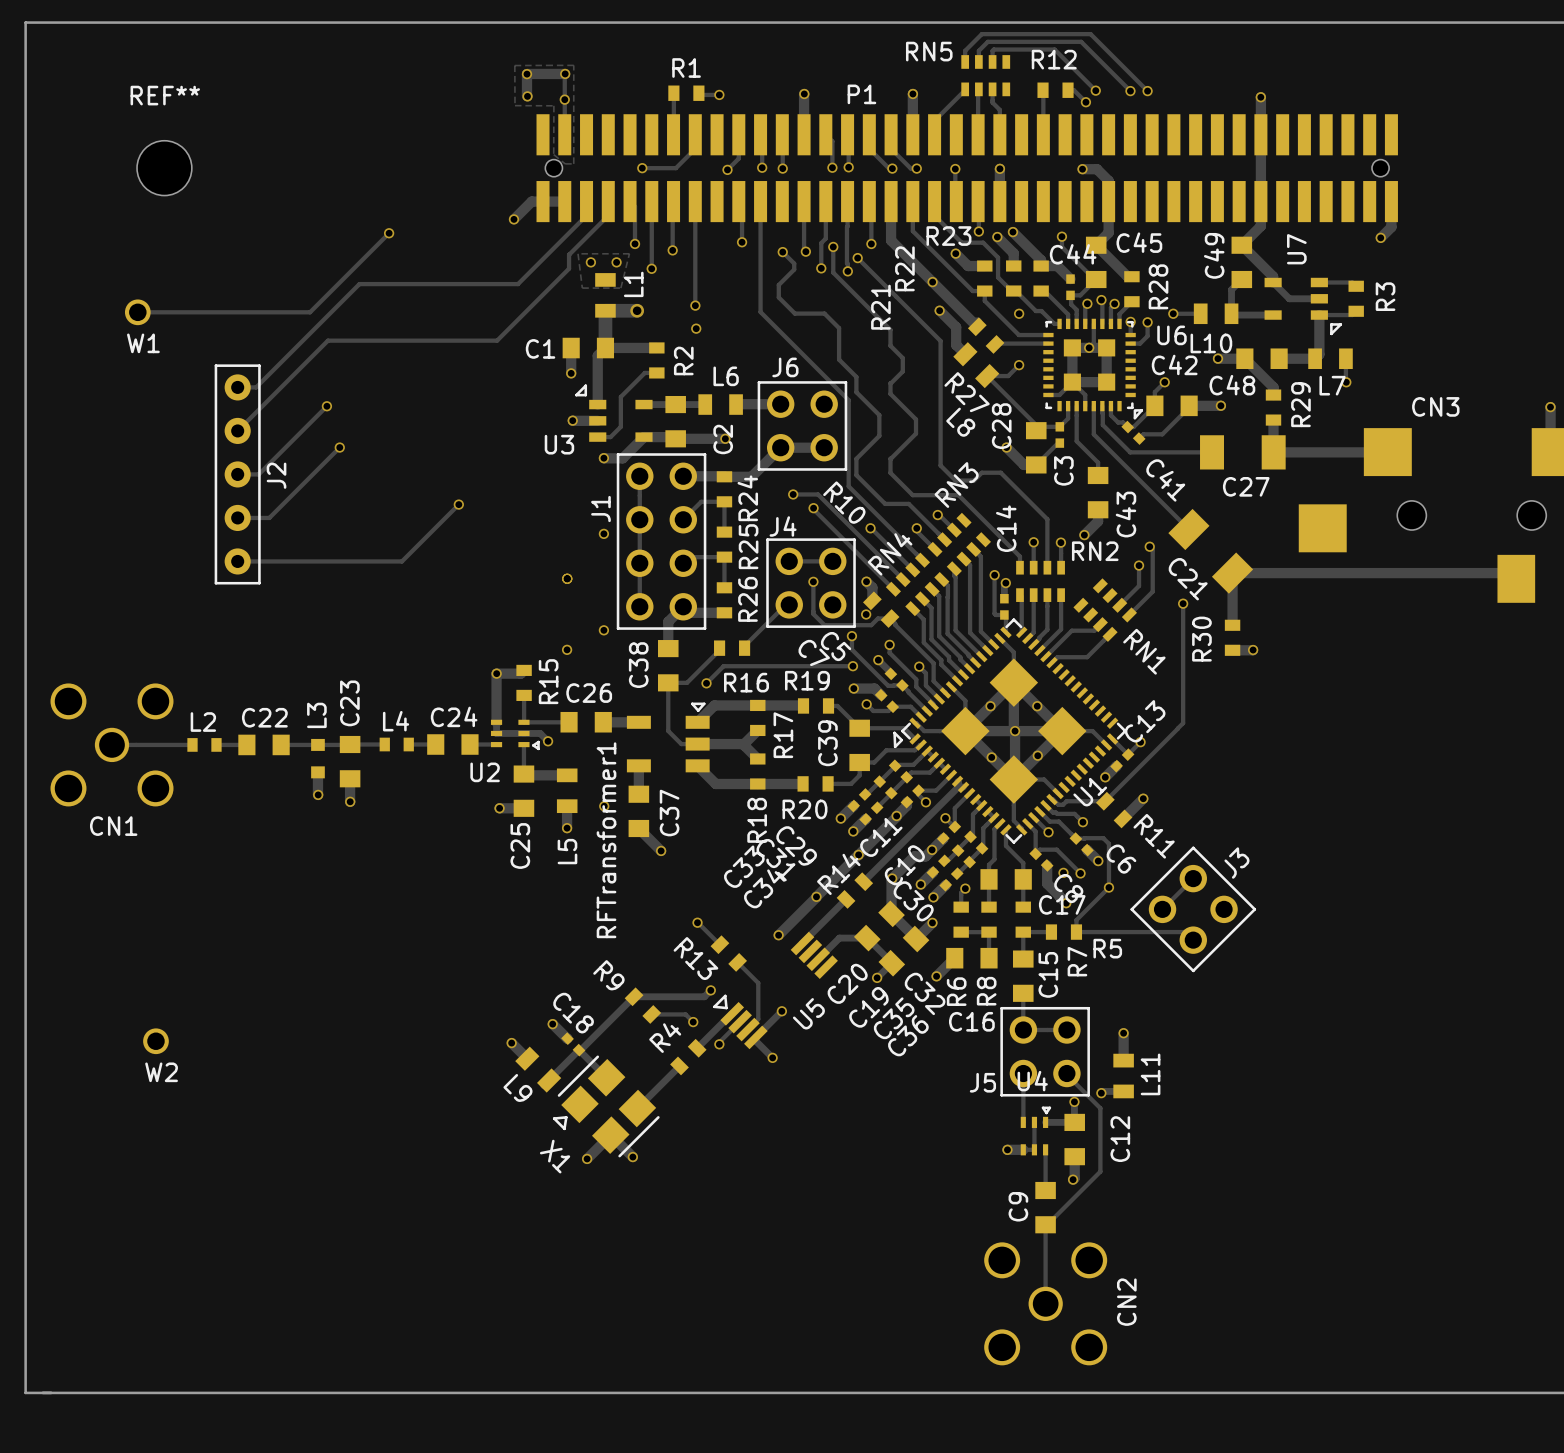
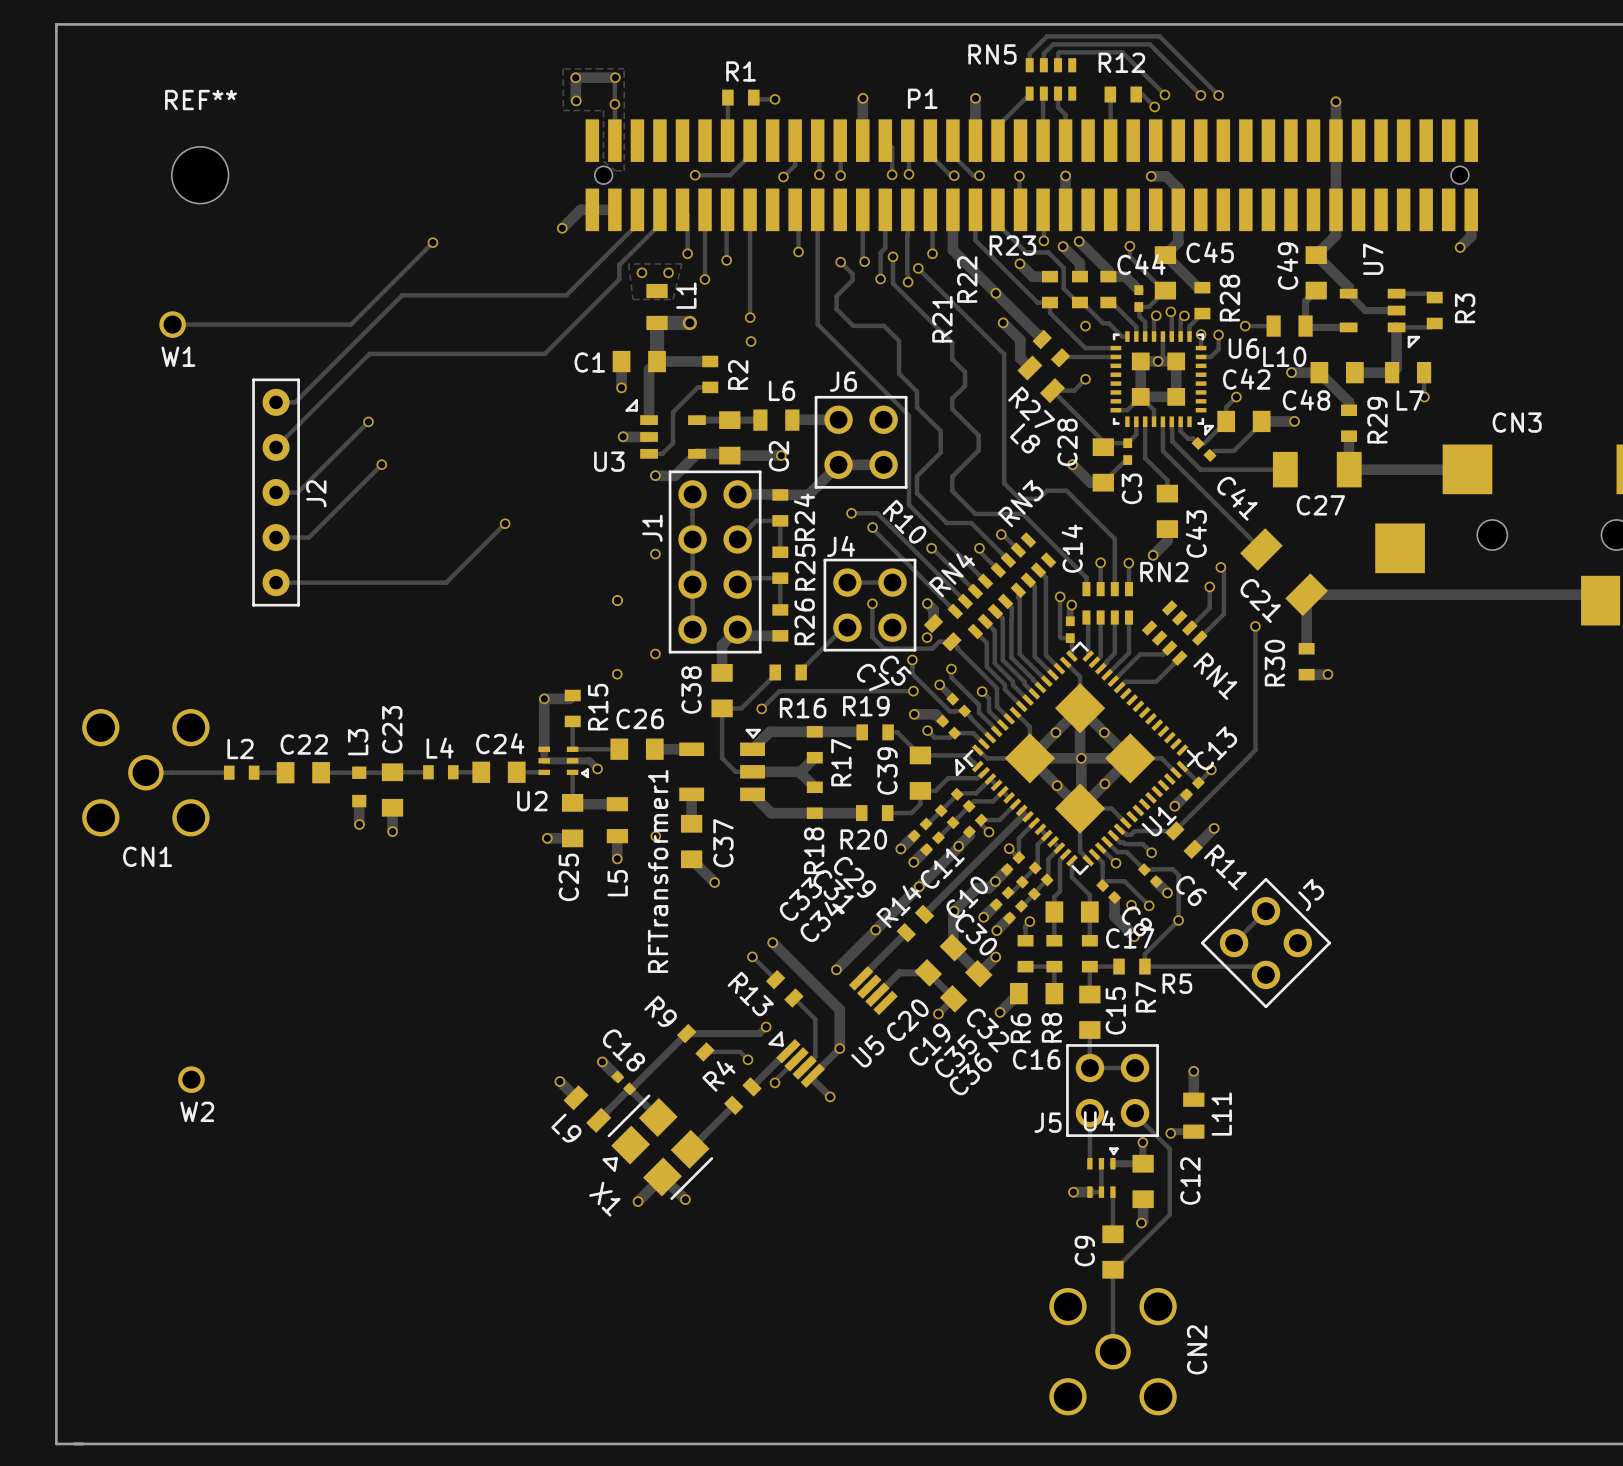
track: none -> (772, 942) (839, 1009) (839, 1048)
via: none -> (772, 942)

